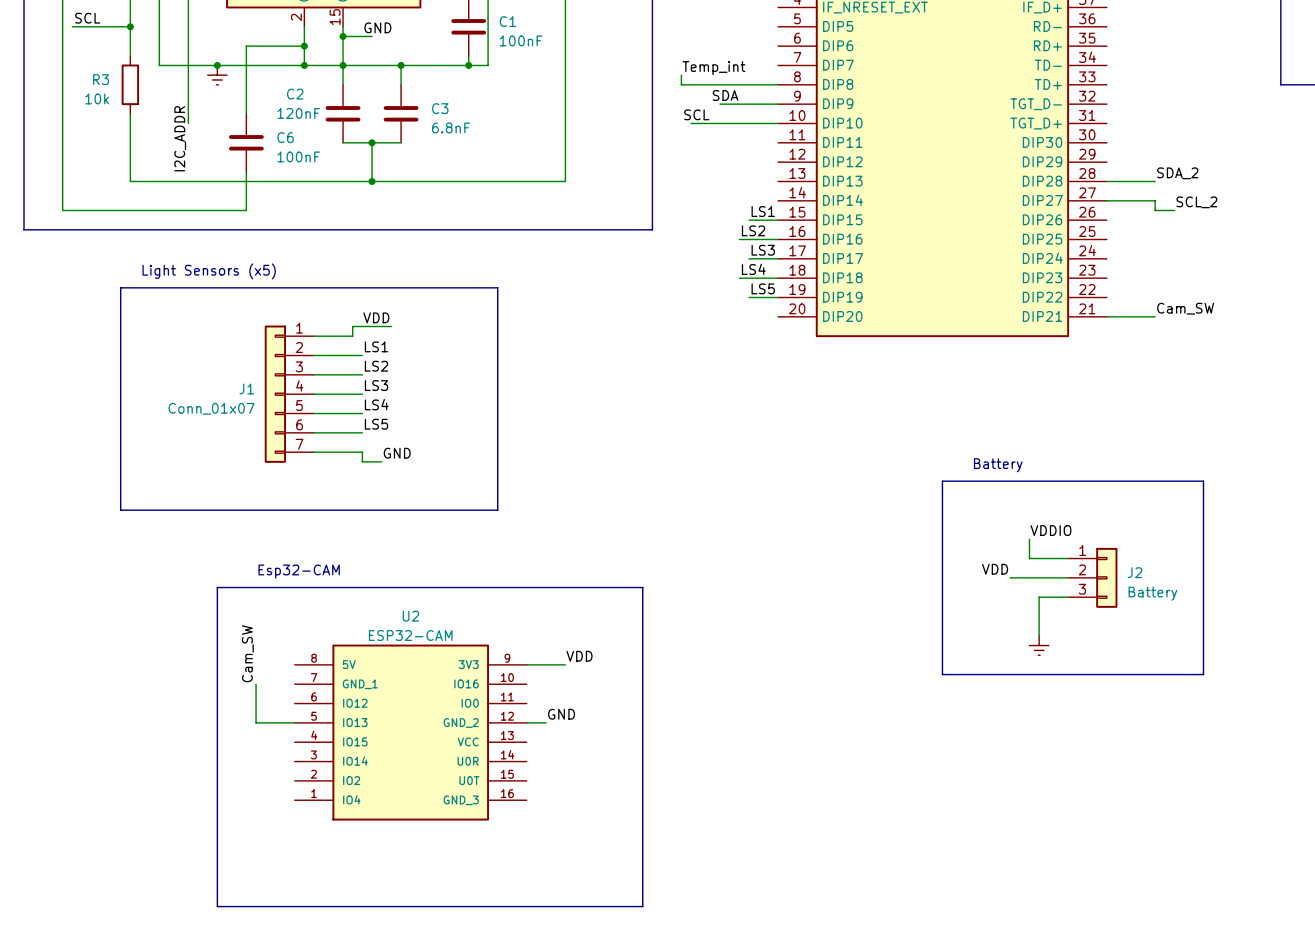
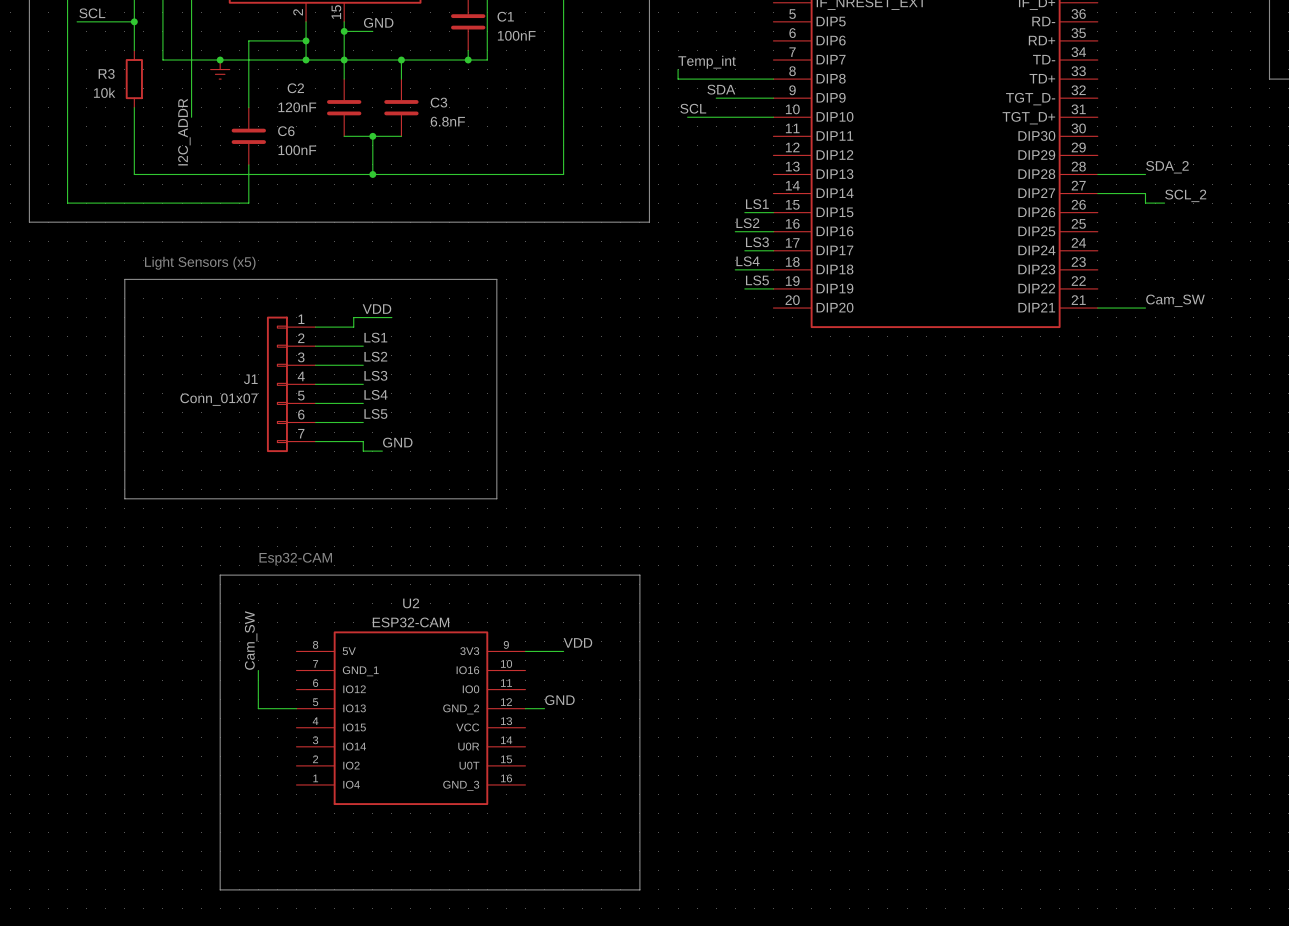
text: Battery (998, 465) -> none
line: (942, 481) (942, 674) (1203, 674) (1203, 481) (942, 481) -> none
label: VDDIO (1050, 530) -> none
wire: (1029, 539) (1029, 558) (1068, 558) -> none
label: VDD (995, 569) -> none
wire: (1010, 577) (1068, 577) -> none
J2: Battery (1092, 577) -> none
wire: (1068, 597) (1039, 597) (1039, 635) -> none
power symbol: (1039, 645) -> none

